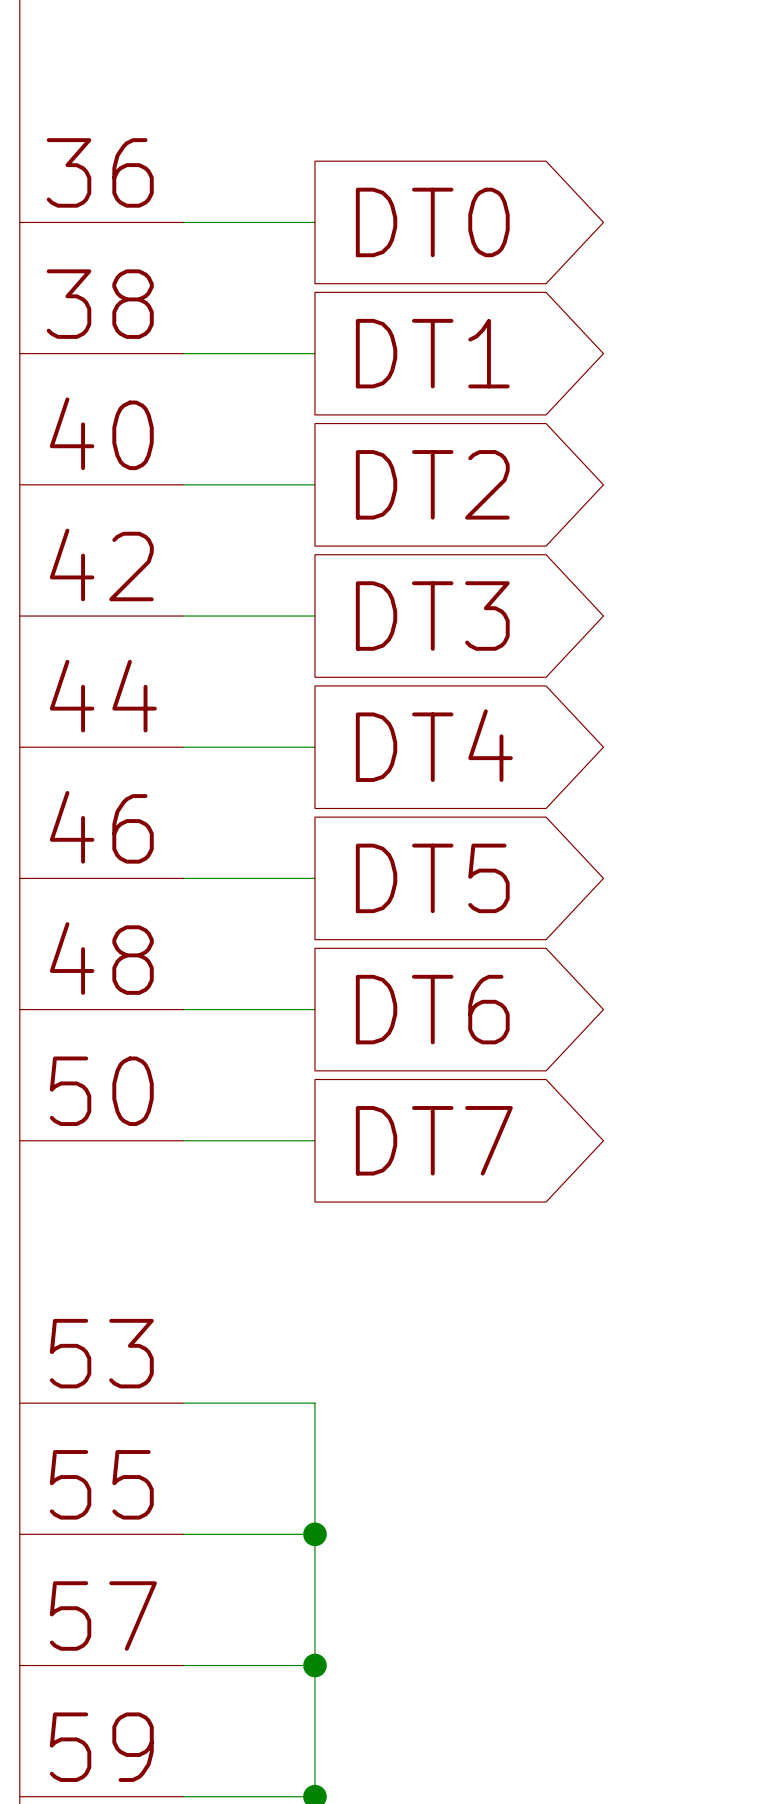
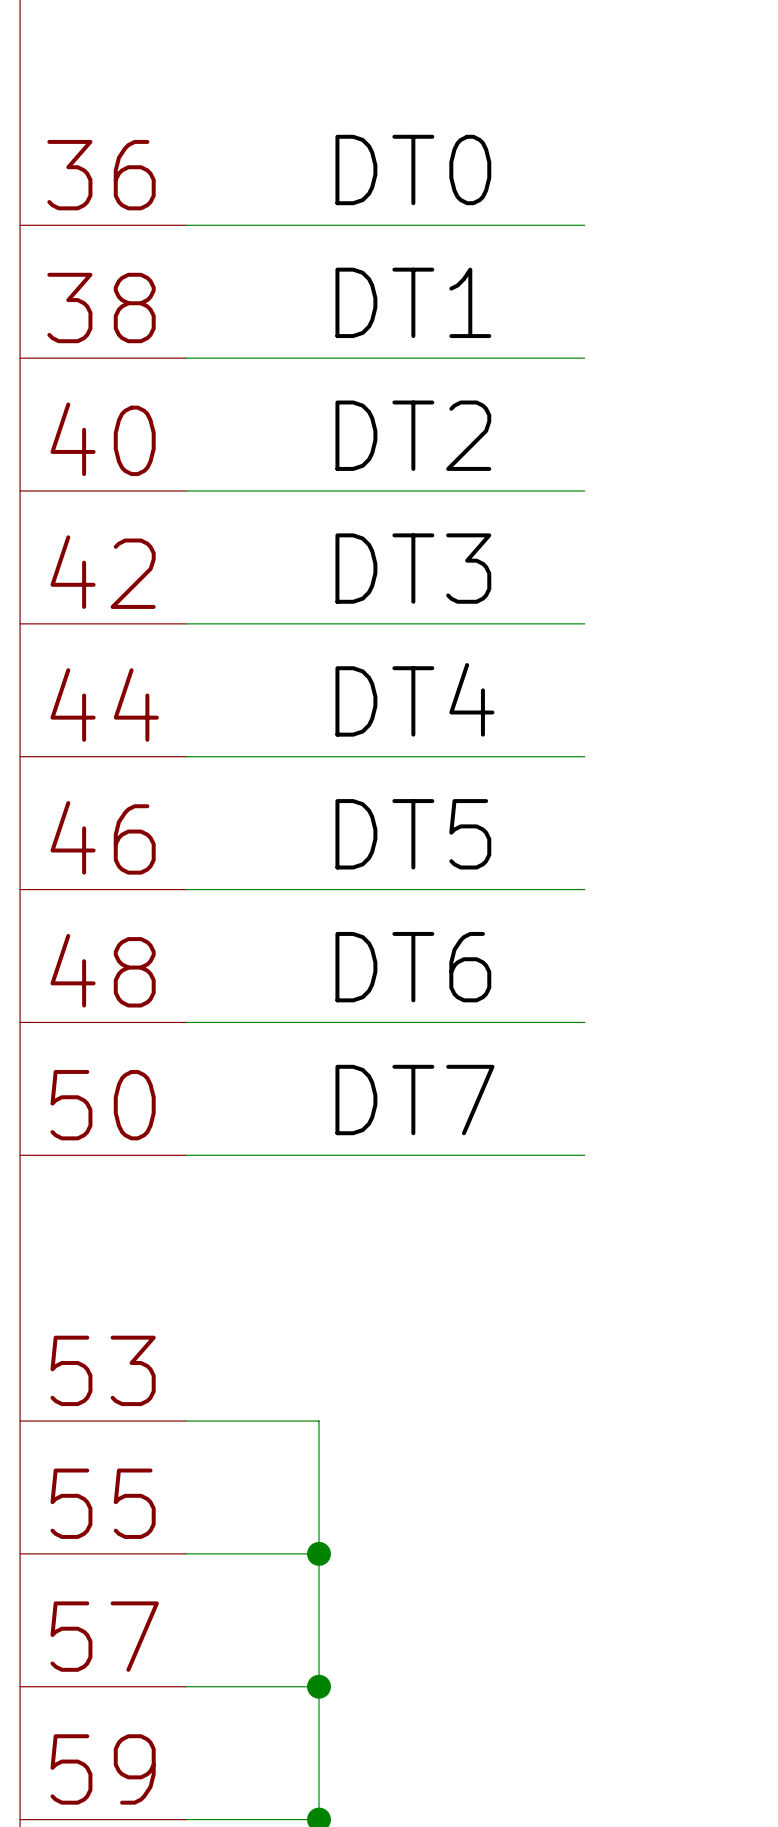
label: none -> DT0 (413, 169)
wire: none -> (318, 225) (584, 225)
global label: DT0 (432, 222) -> none
label: none -> DT1 (413, 302)
wire: none -> (318, 358) (584, 358)
global label: DT1 (432, 353) -> none
label: none -> DT2 (413, 435)
wire: none -> (318, 491) (584, 491)
global label: DT2 (432, 484) -> none
label: none -> DT3 (413, 568)
wire: none -> (318, 623) (584, 623)
global label: DT3 (432, 616) -> none
label: none -> DT4 (414, 699)
global label: DT4 (434, 745) -> none
wire: none -> (318, 756) (584, 756)
label: none -> DT5 (413, 834)
wire: none -> (318, 889) (584, 889)
global label: DT5 (432, 878) -> none
label: none -> DT6 (413, 967)
wire: none -> (318, 1022) (584, 1022)
global label: DT6 (432, 1009) -> none
label: none -> DT7 (414, 1100)
wire: none -> (318, 1155) (584, 1155)
global label: DT7 (434, 1140) -> none

